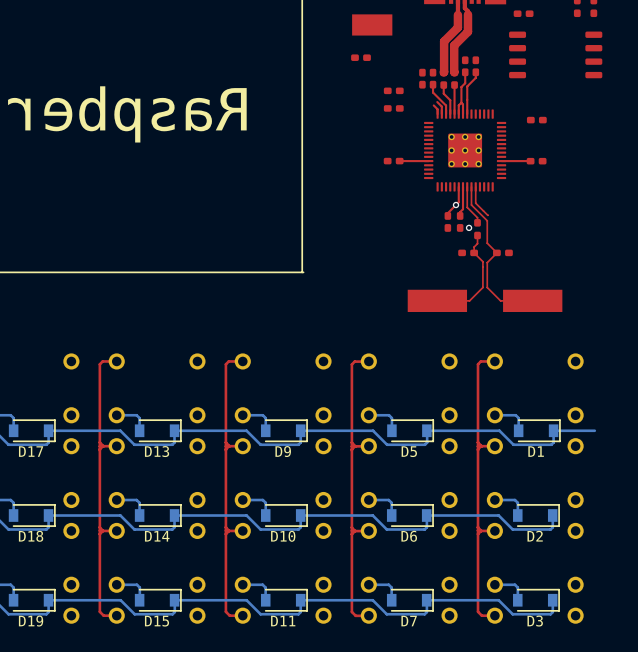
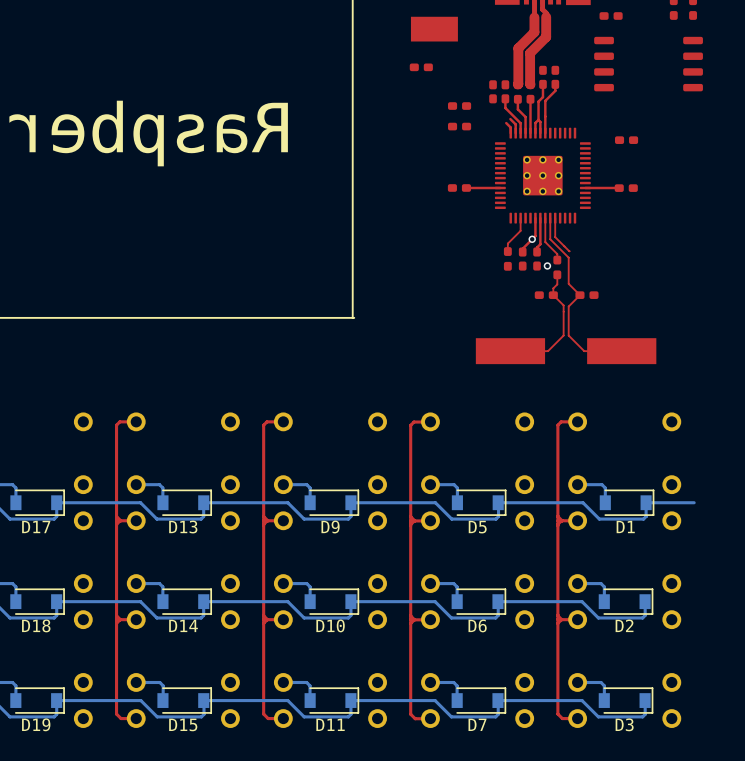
top track: none -> (520, 218) (520, 230) (507, 243) (507, 251)
part: none -> (507, 258)

